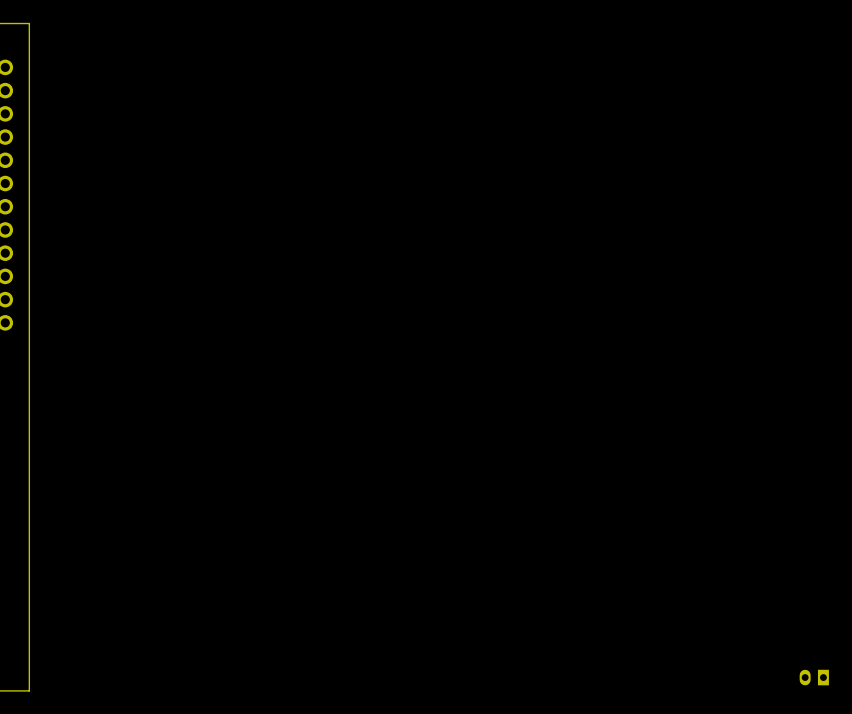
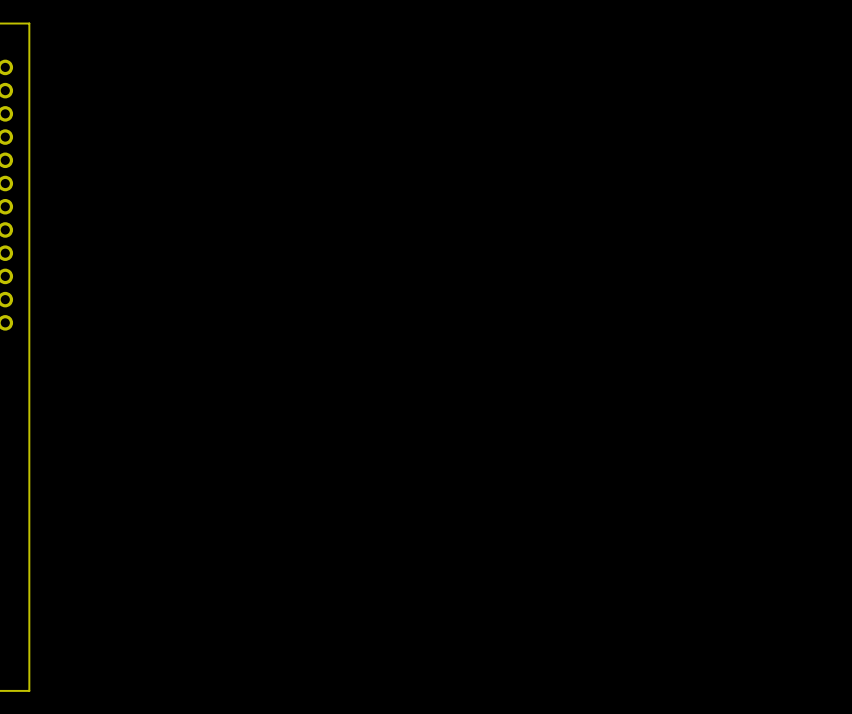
part: (814, 677) -> none

